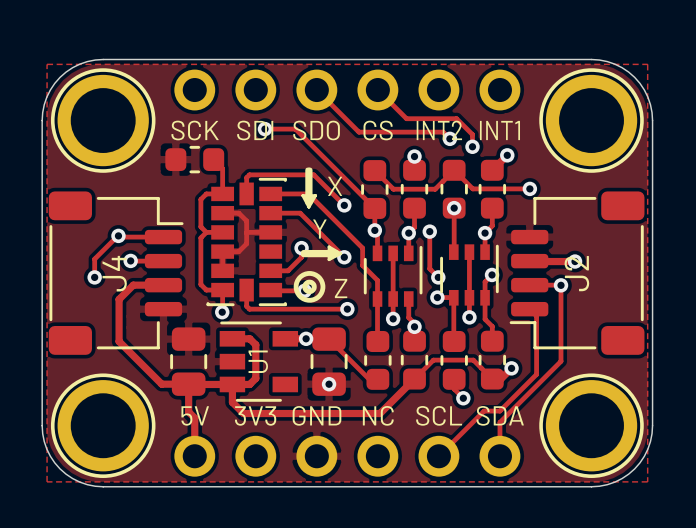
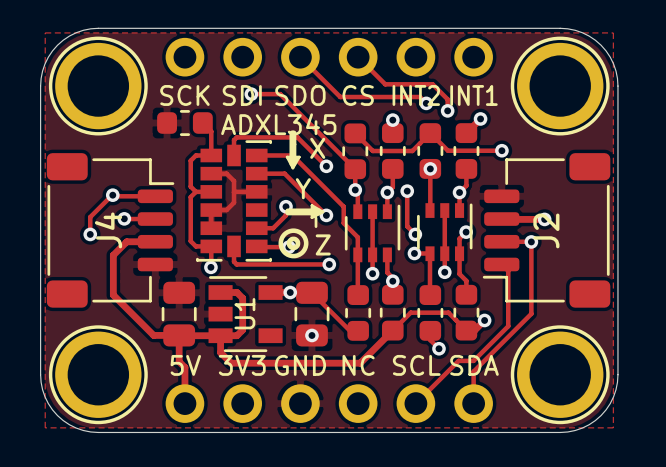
ADXL345 name: none -> ADXL345 (278, 124)
line: none -> (316, 217) (316, 226)

